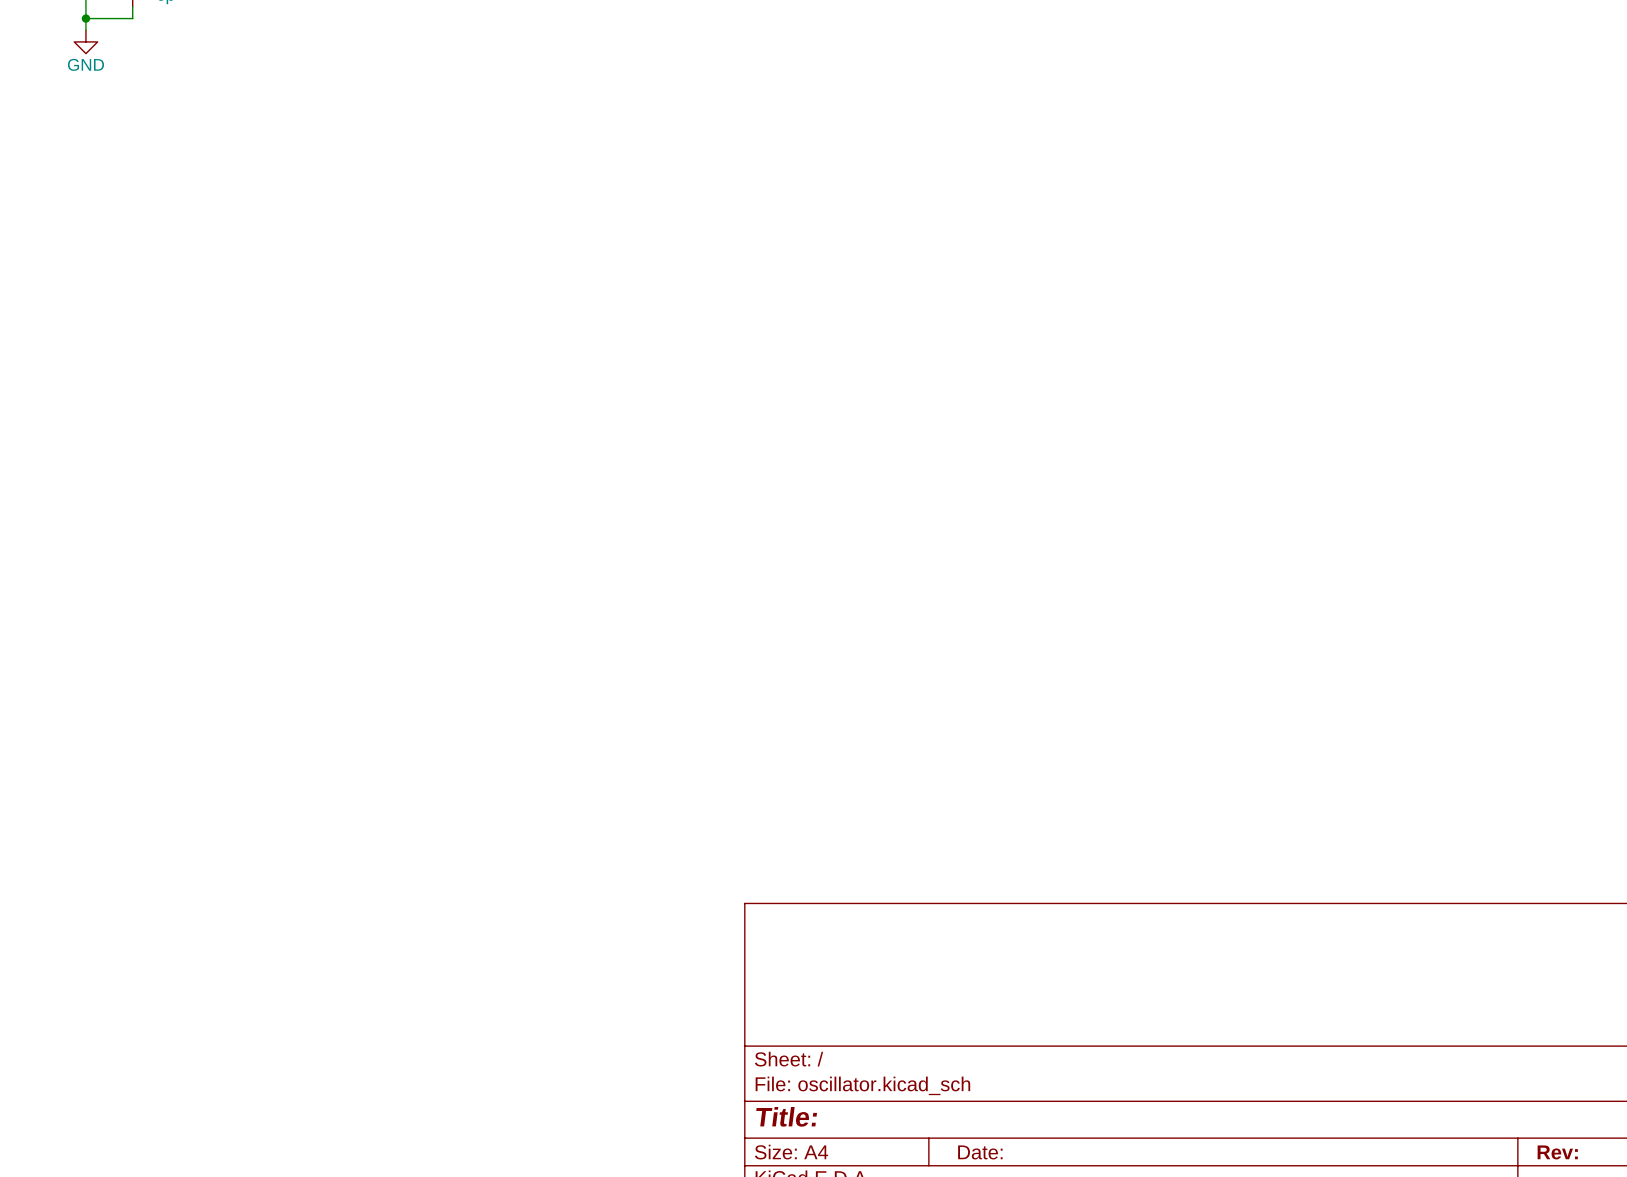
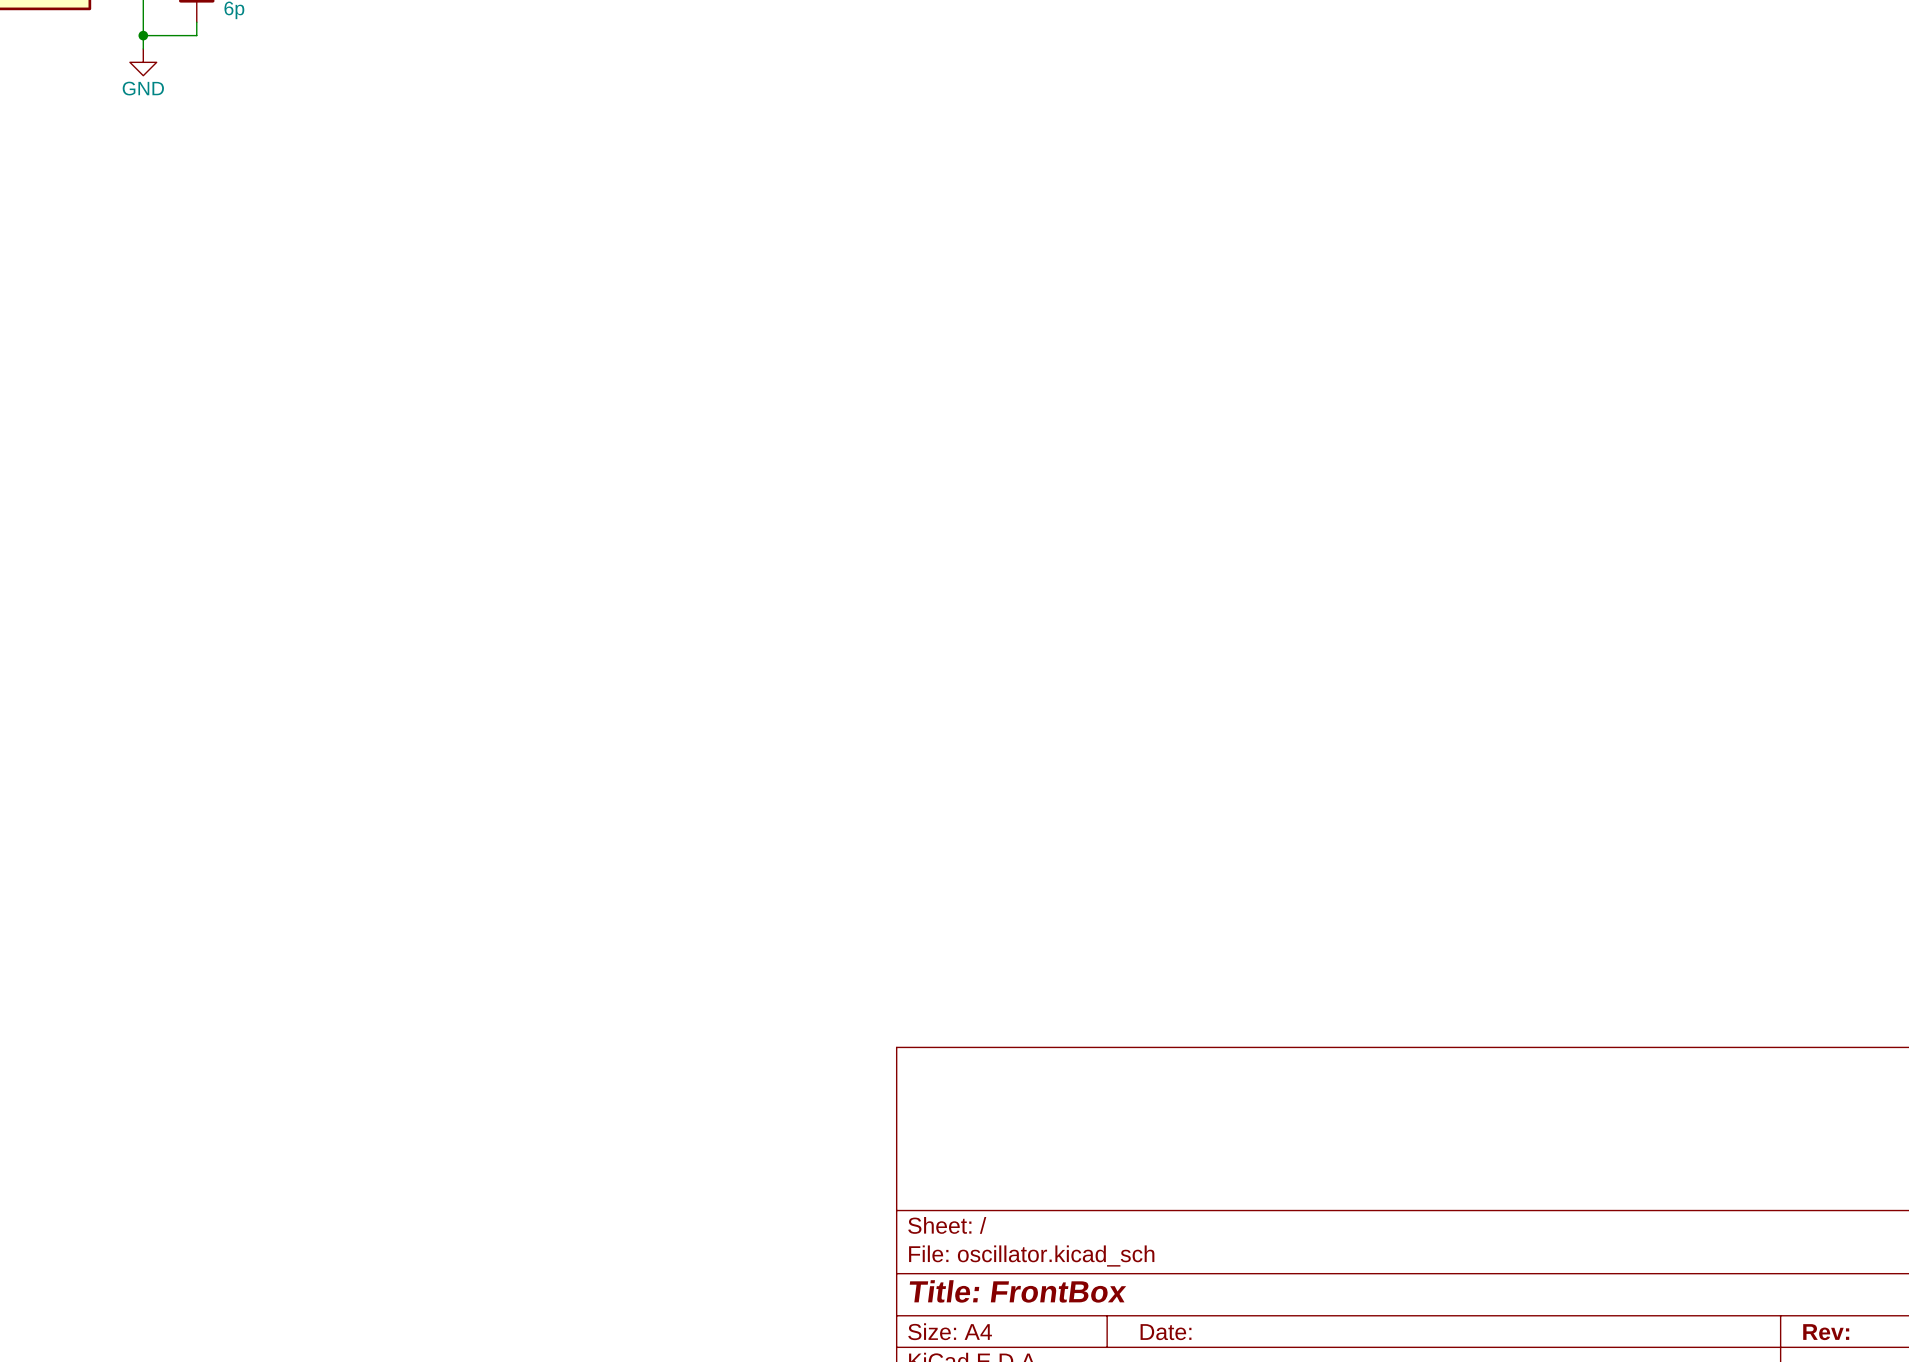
title block: Title: (786, 1116) -> Title: FrontBox (1017, 1291)

